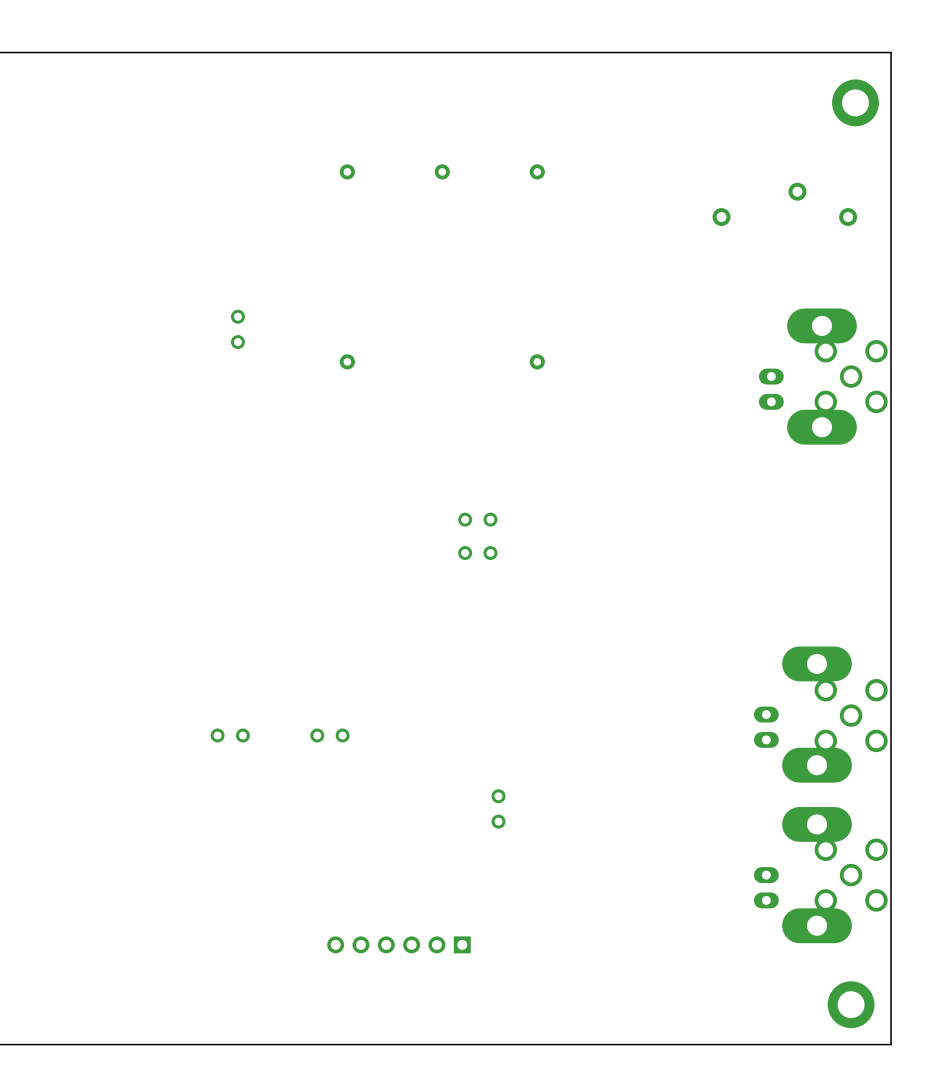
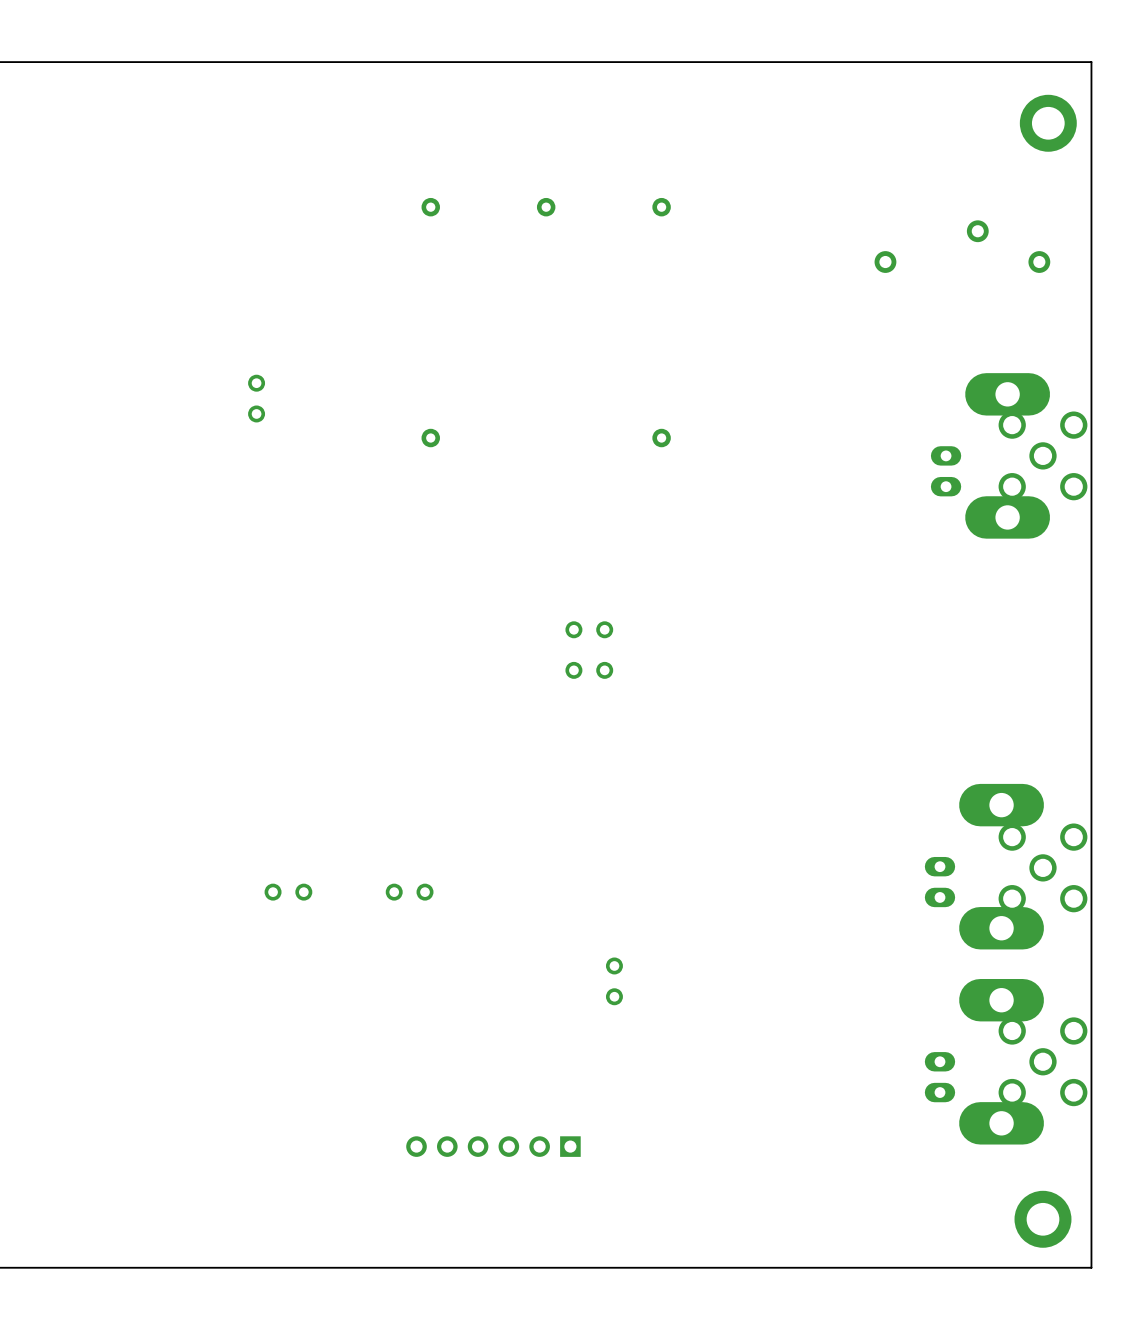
part position: (237, 329) -> (256, 398)

